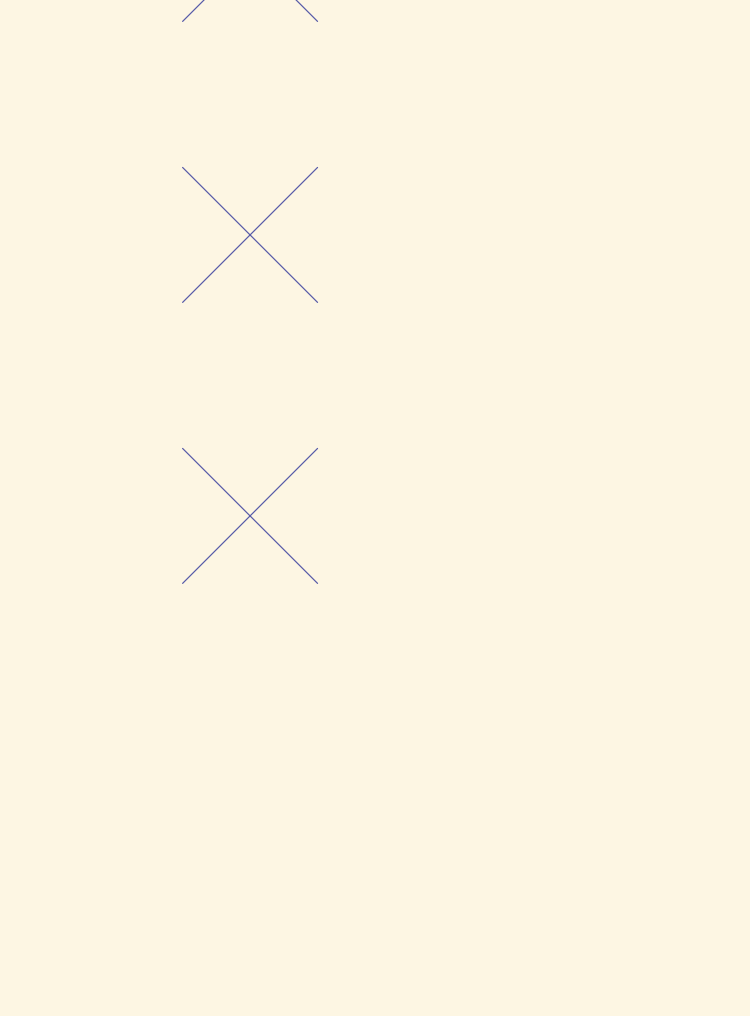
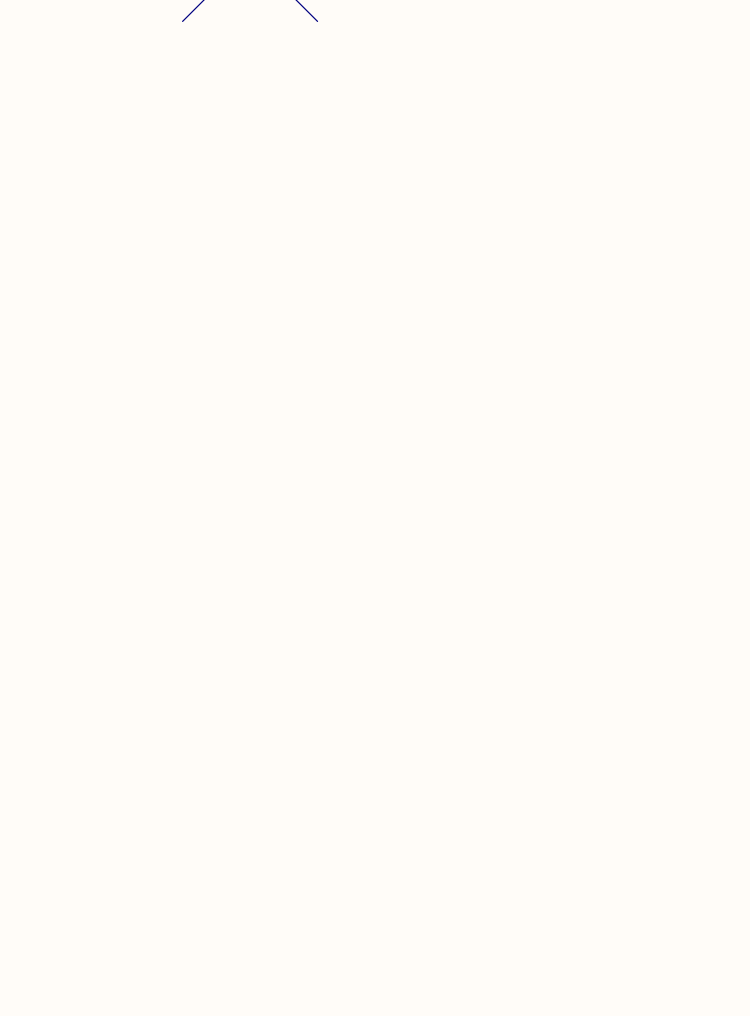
no-connect mark: (250, 234) -> none
no-connect mark: (250, 515) -> none

